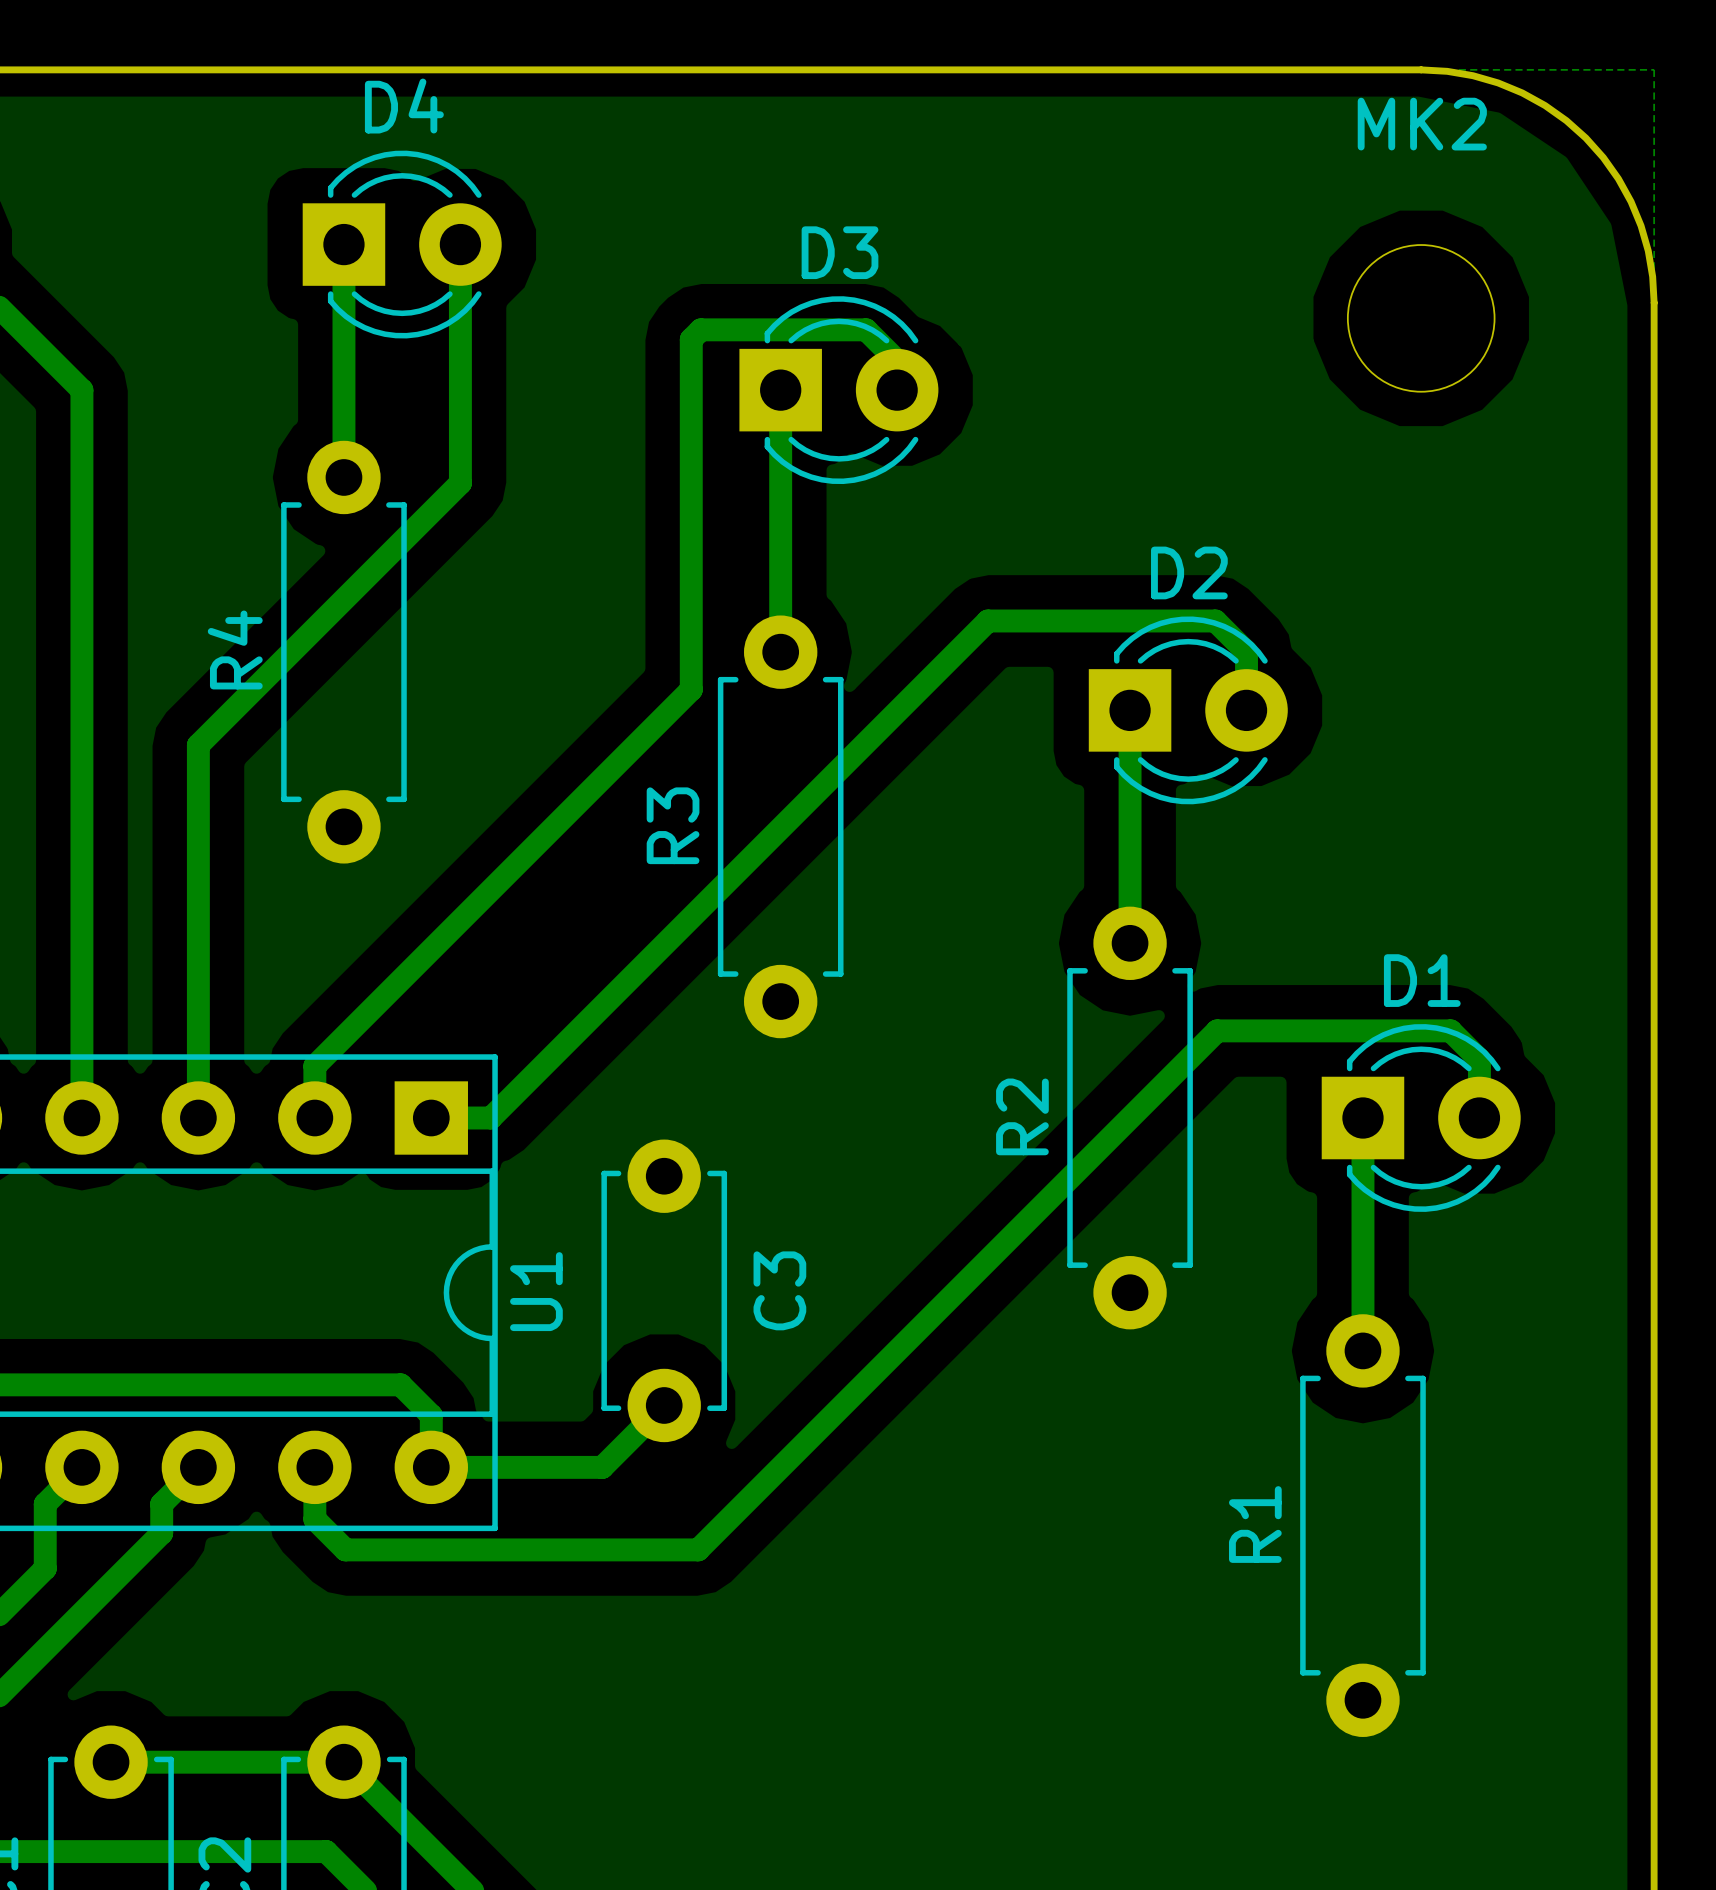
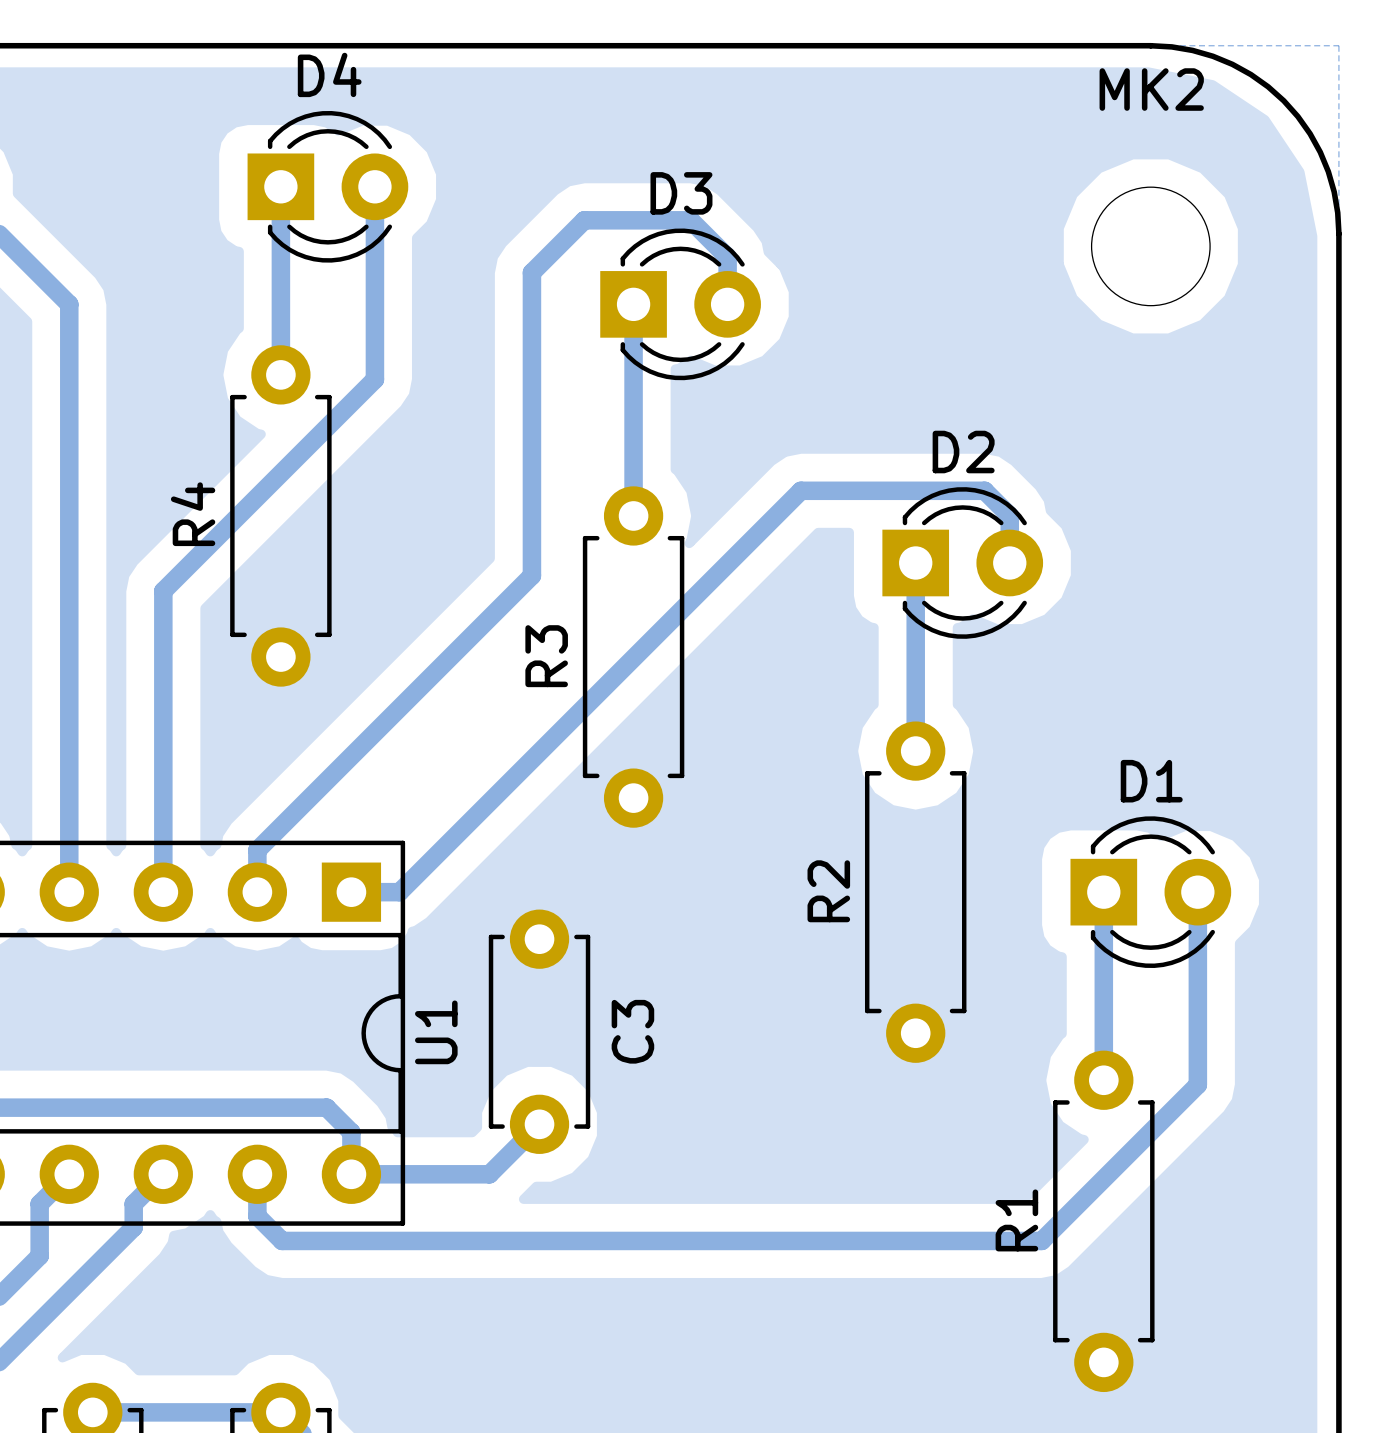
bottom track: (897, 360) (866, 329) (700, 329) (691, 339) (691, 689) (654, 726) -> (727, 280) (727, 257) (690, 220) (584, 220) (531, 272) (531, 575)
bottom track: (1479, 1118) (1479, 1059) (1450, 1030) (1217, 1030) (698, 1549) -> (1197, 892) (1197, 1084) (1041, 1240) (566, 1240)

